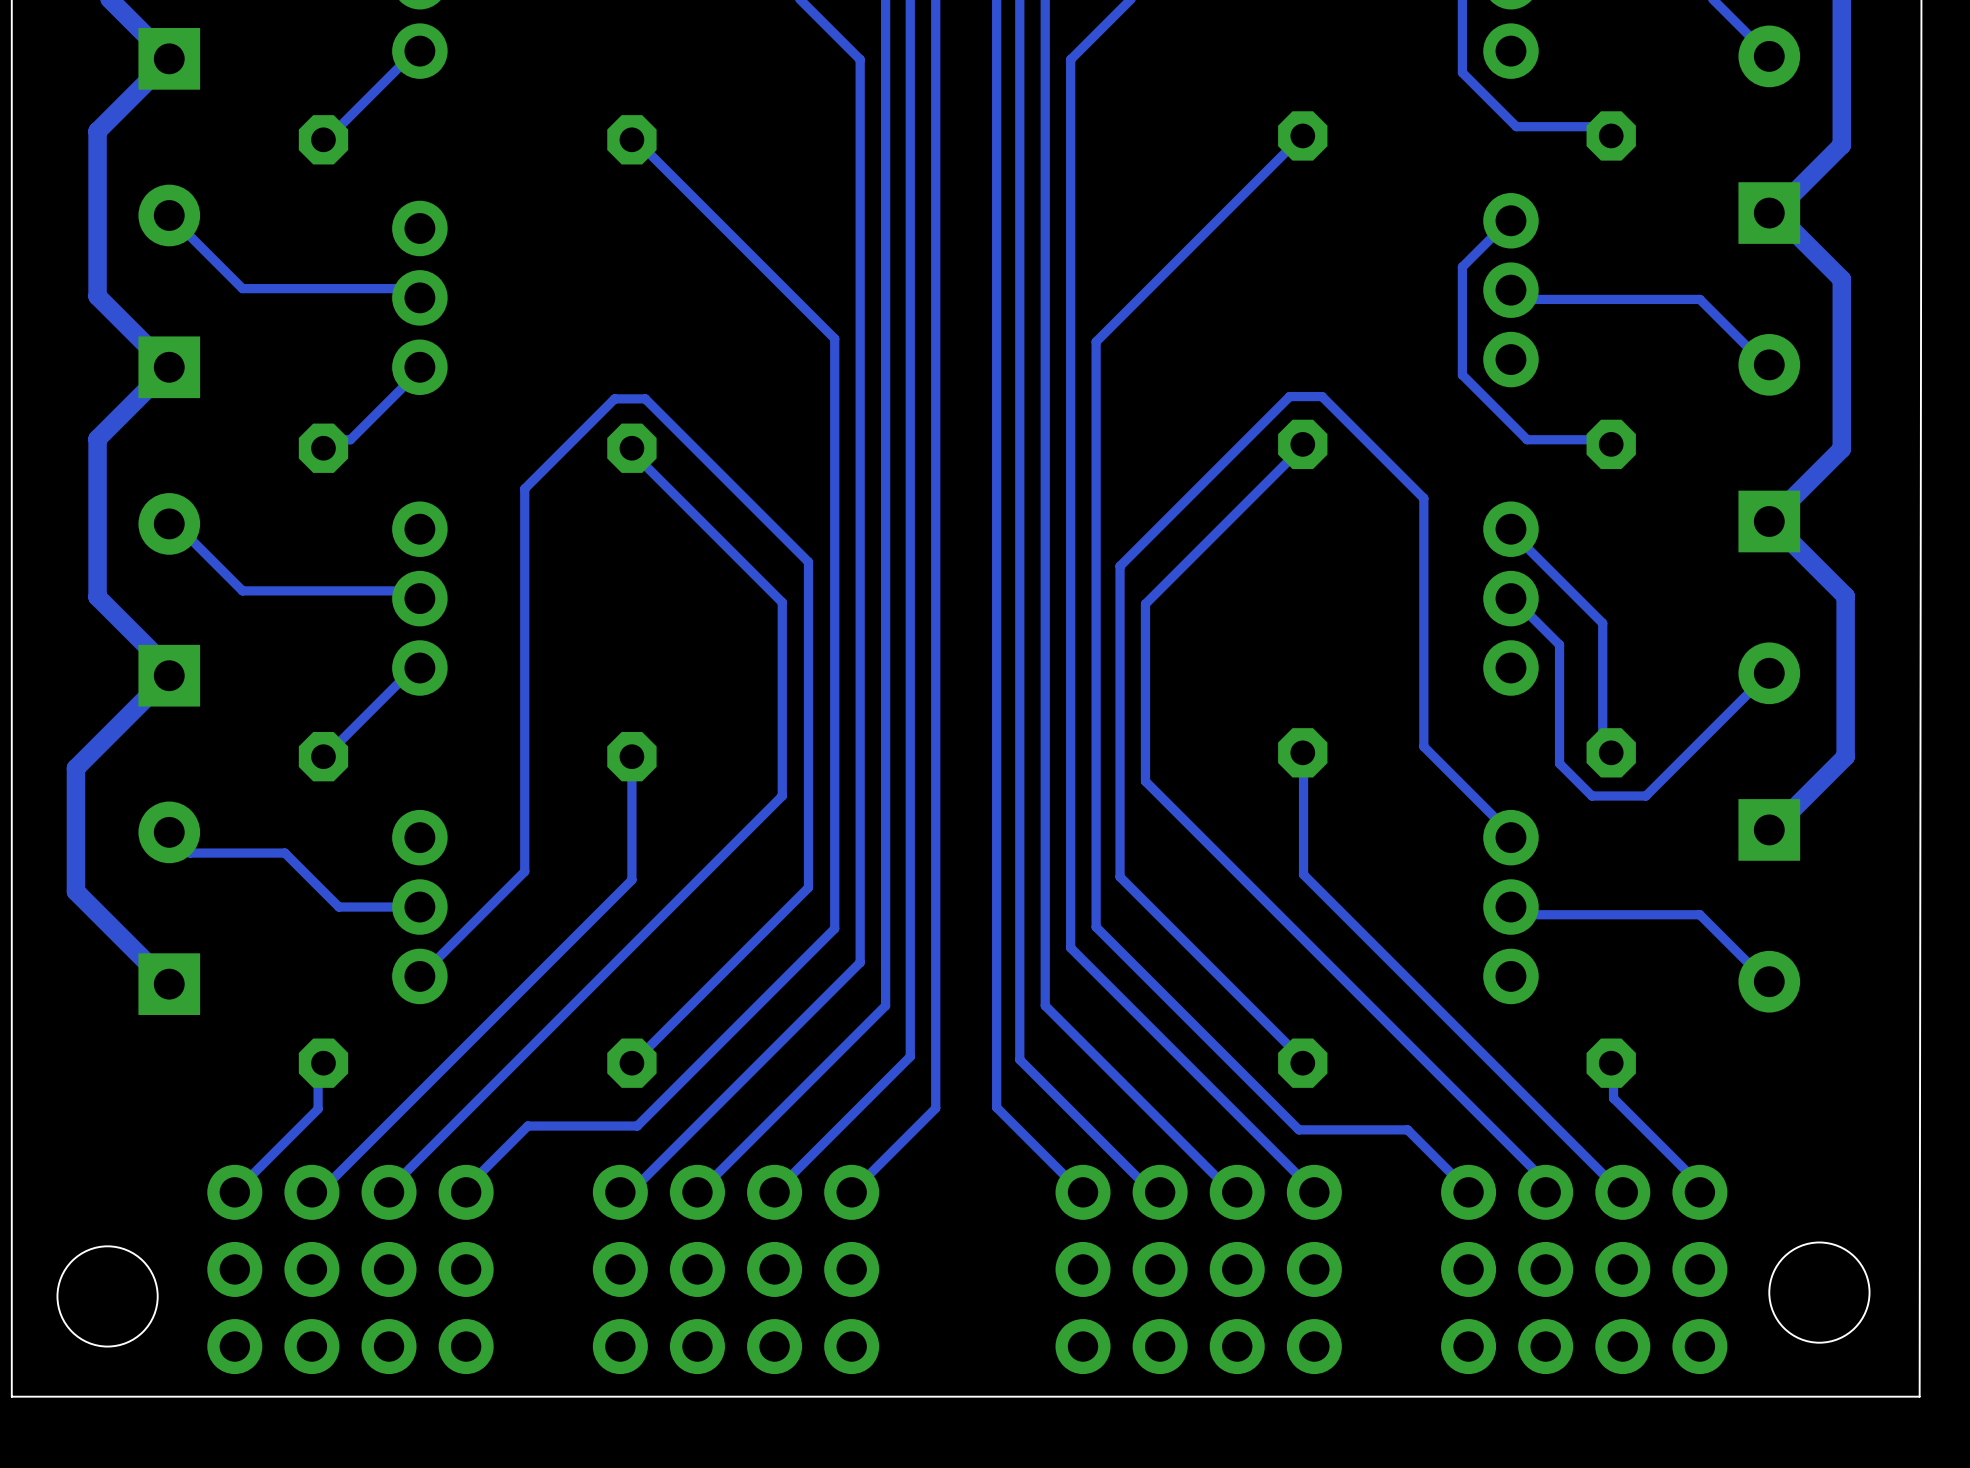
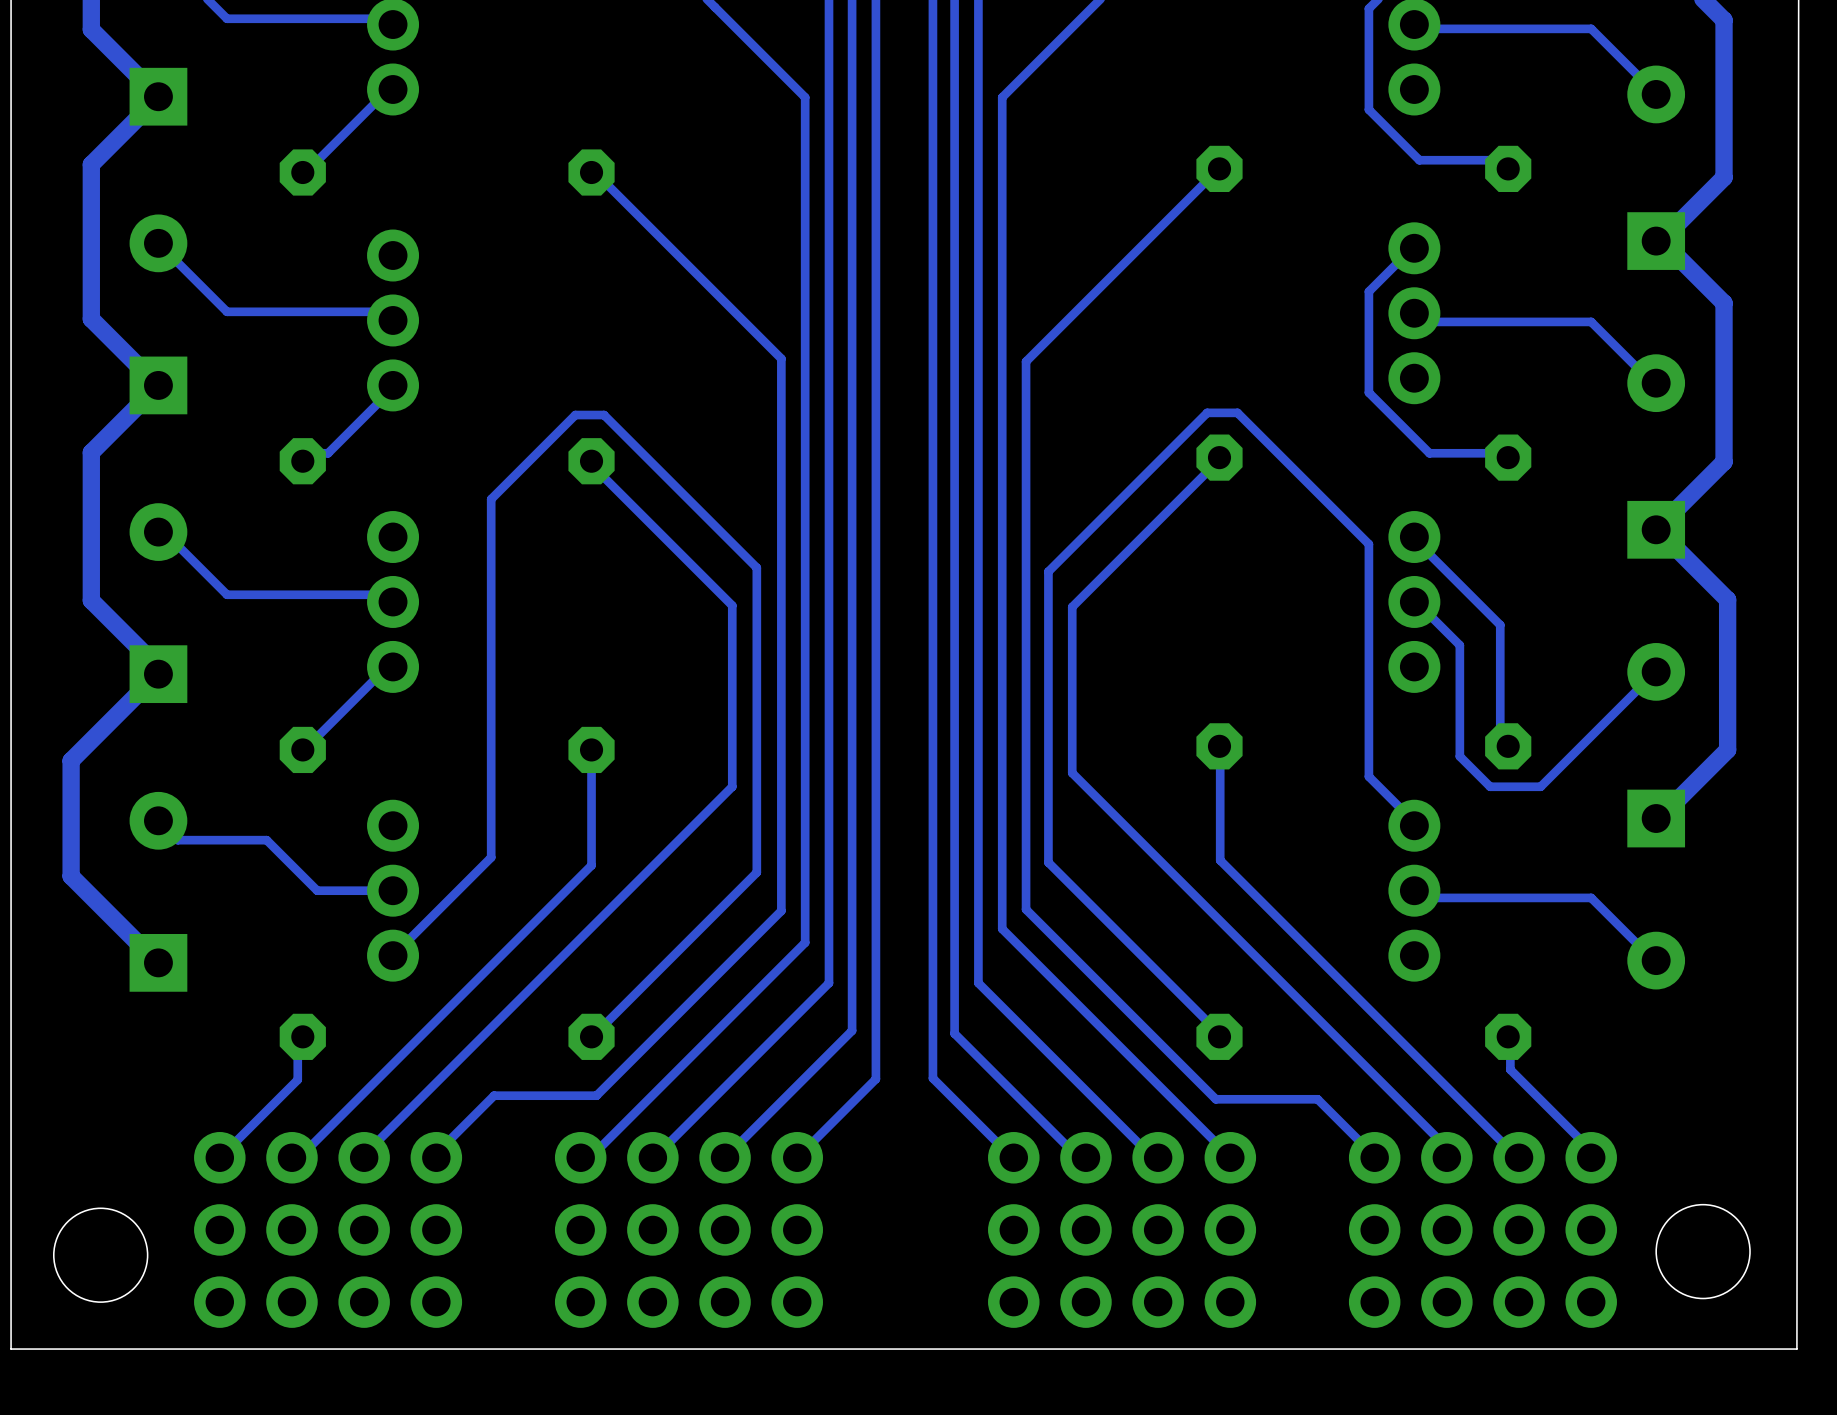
bottom track: (1423, 498) (1423, 746) (1462, 785) -> (1332, 508) (1368, 544) (1368, 776)

